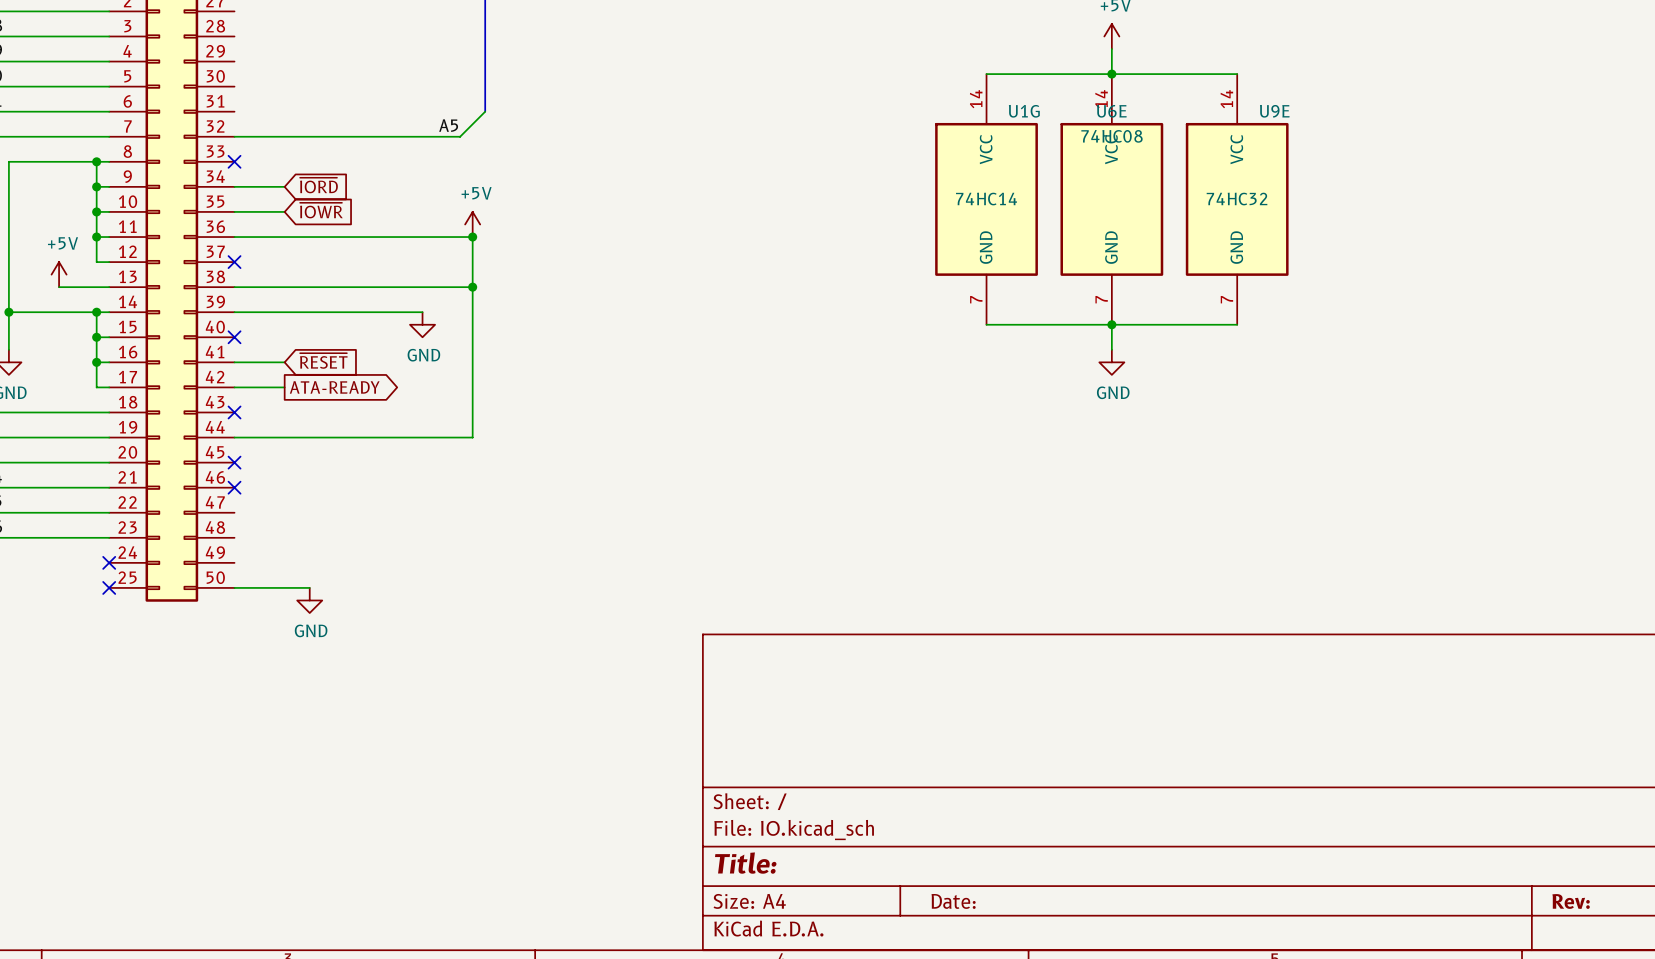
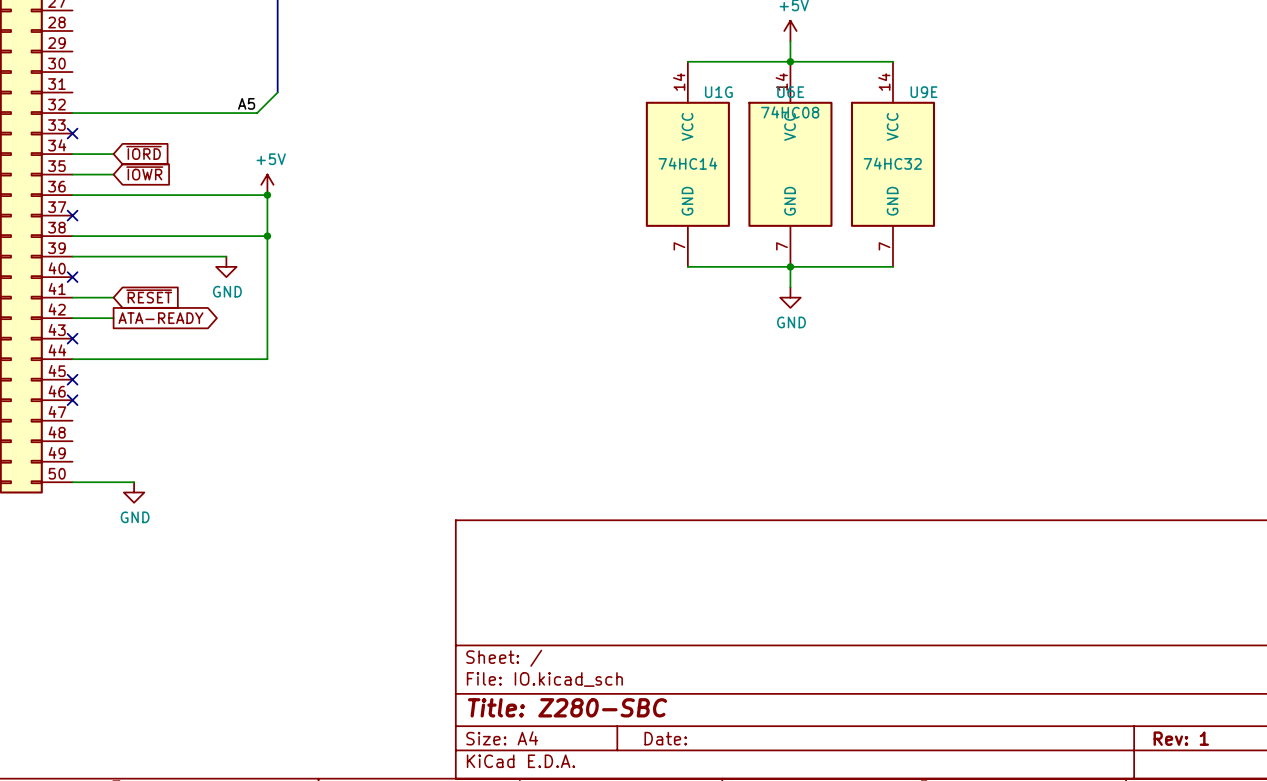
title block: Title: (745, 863) -> Title: Z280-SBC (567, 707)
title block: Rev: (1571, 901) -> Rev: 1 (1181, 738)

